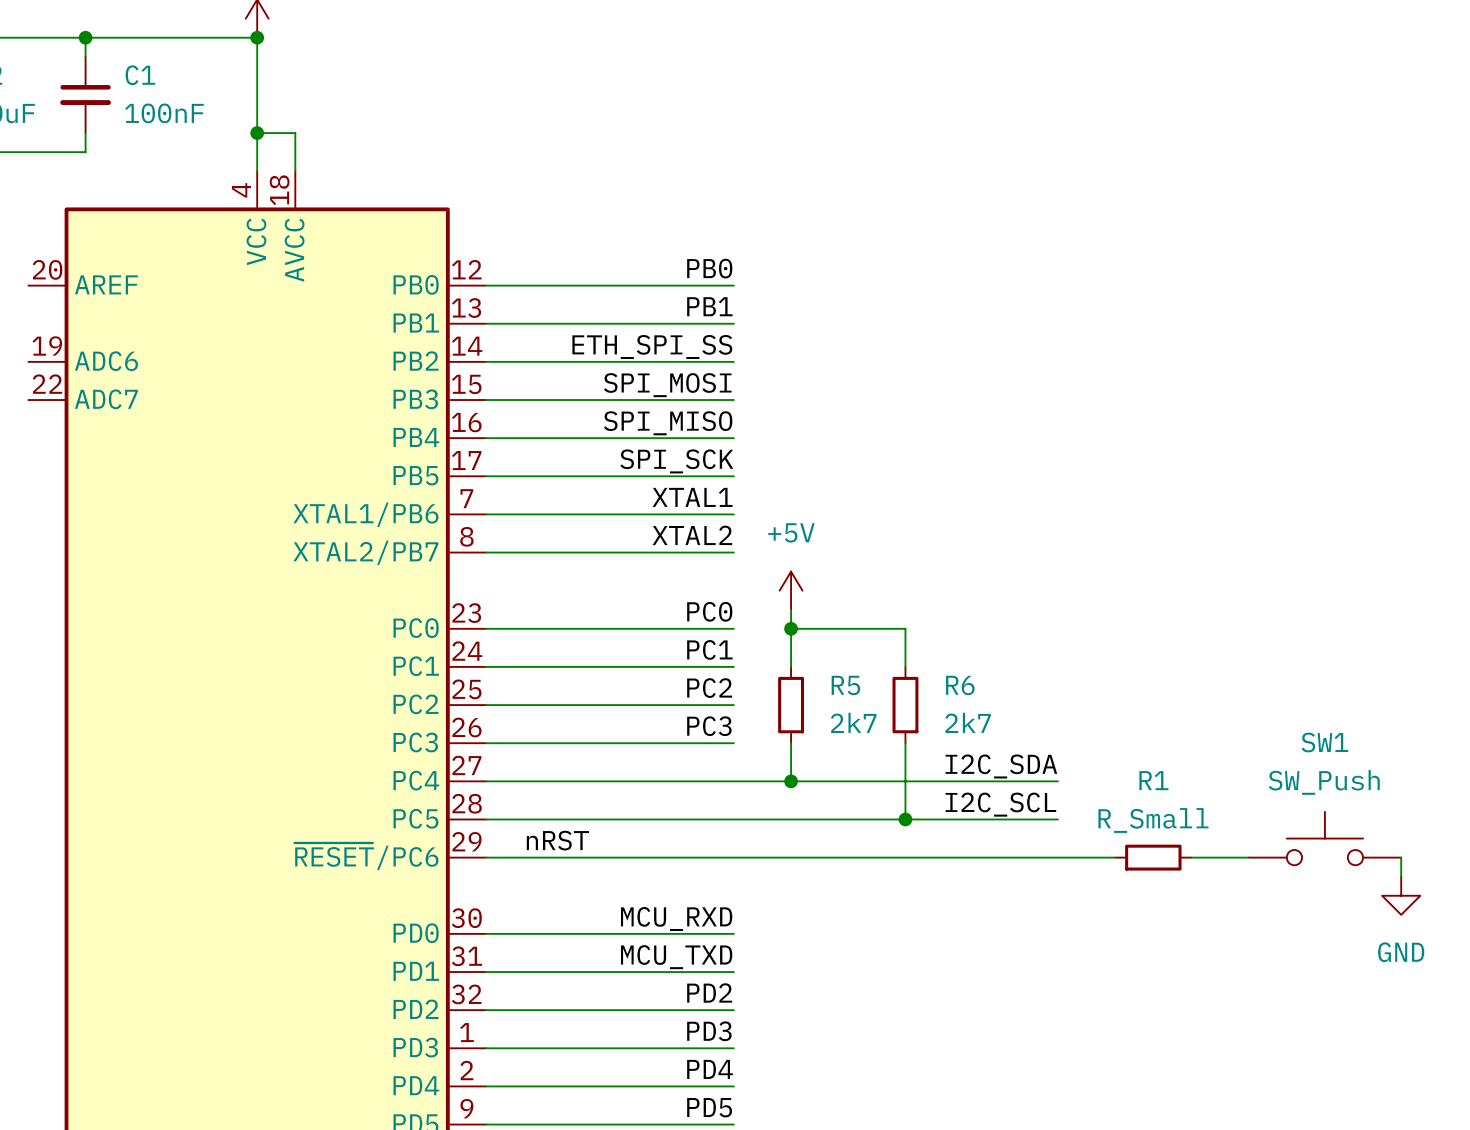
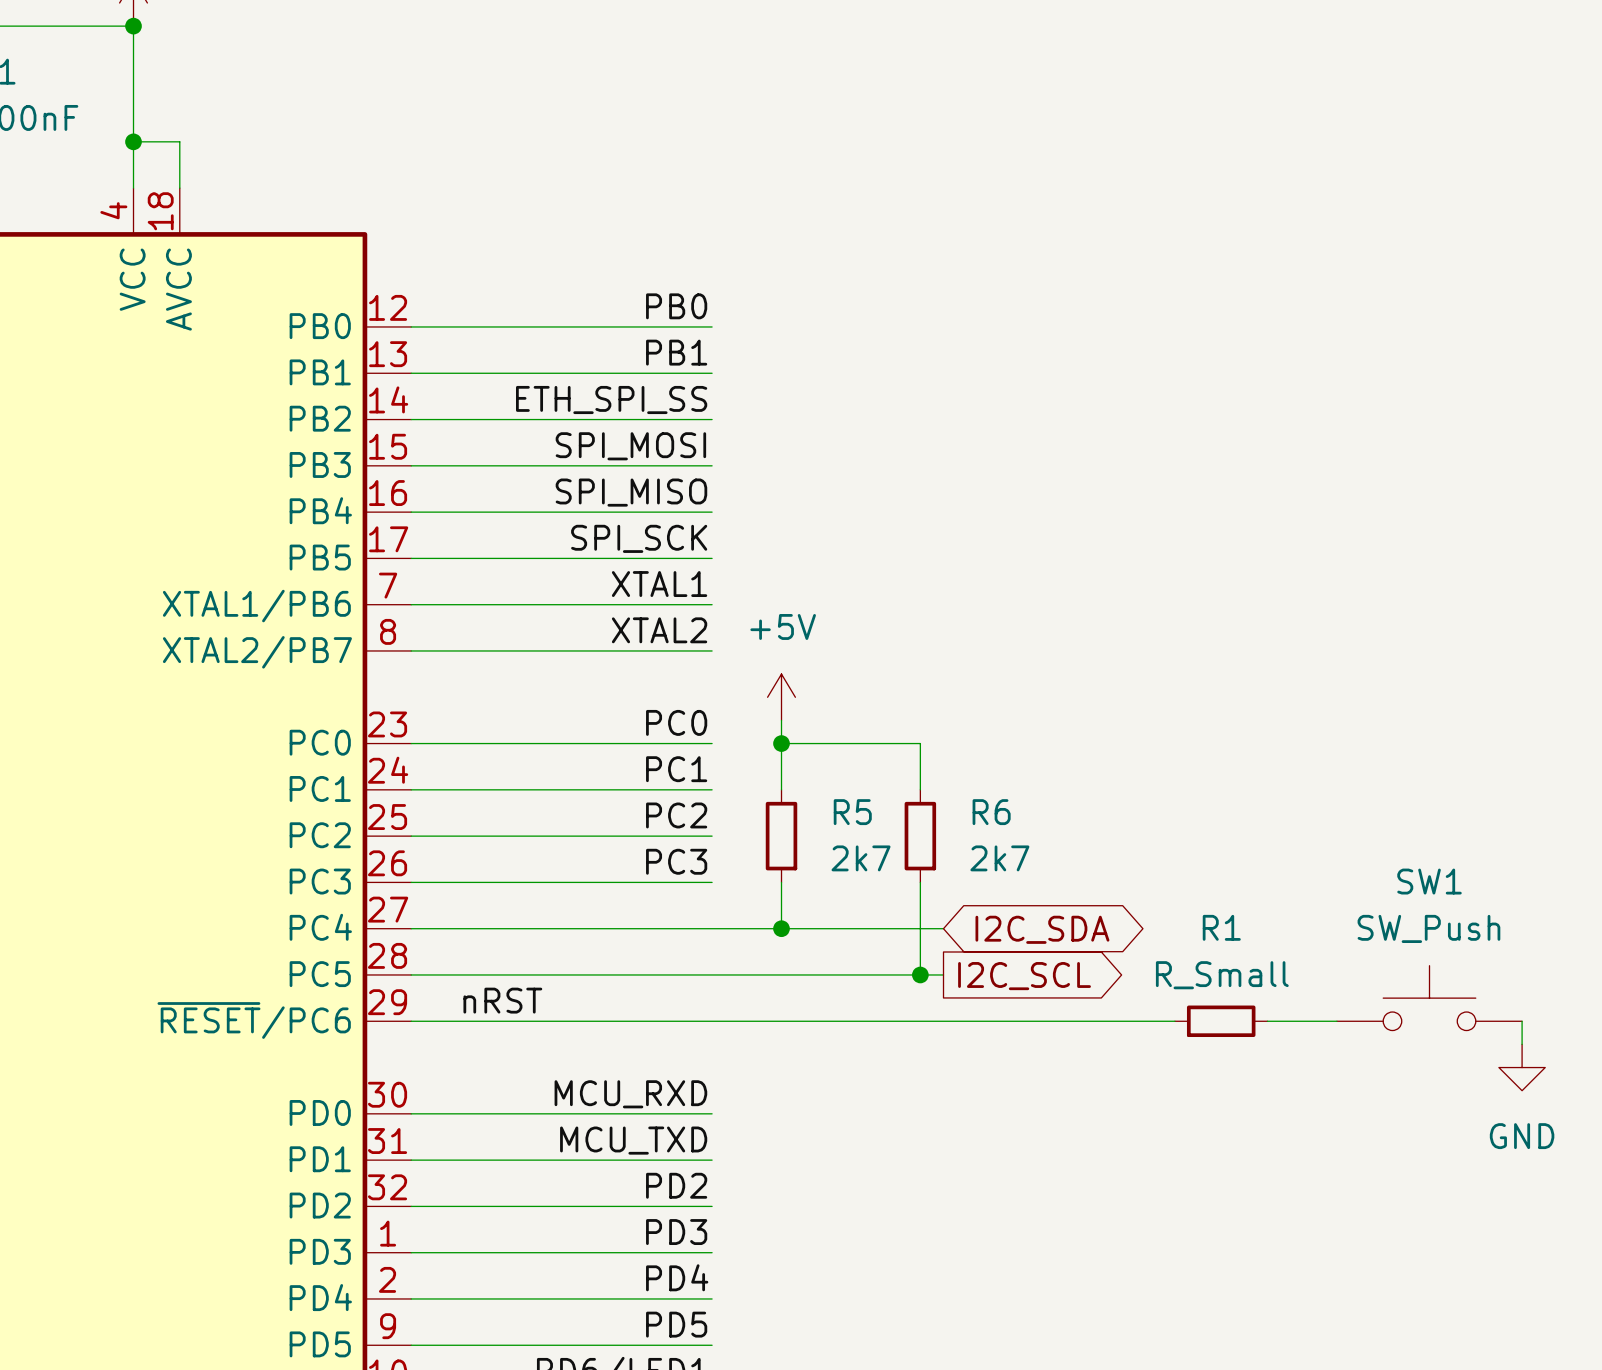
label: I2C_SDA (1001, 766) -> none
wire: (924, 781) (1057, 781) -> none
global label: none -> I2C_SDA (1042, 929)
label: I2C_SCL (1000, 804) -> none
wire: (924, 819) (1057, 819) -> none
global label: none -> I2C_SCL (1024, 976)

